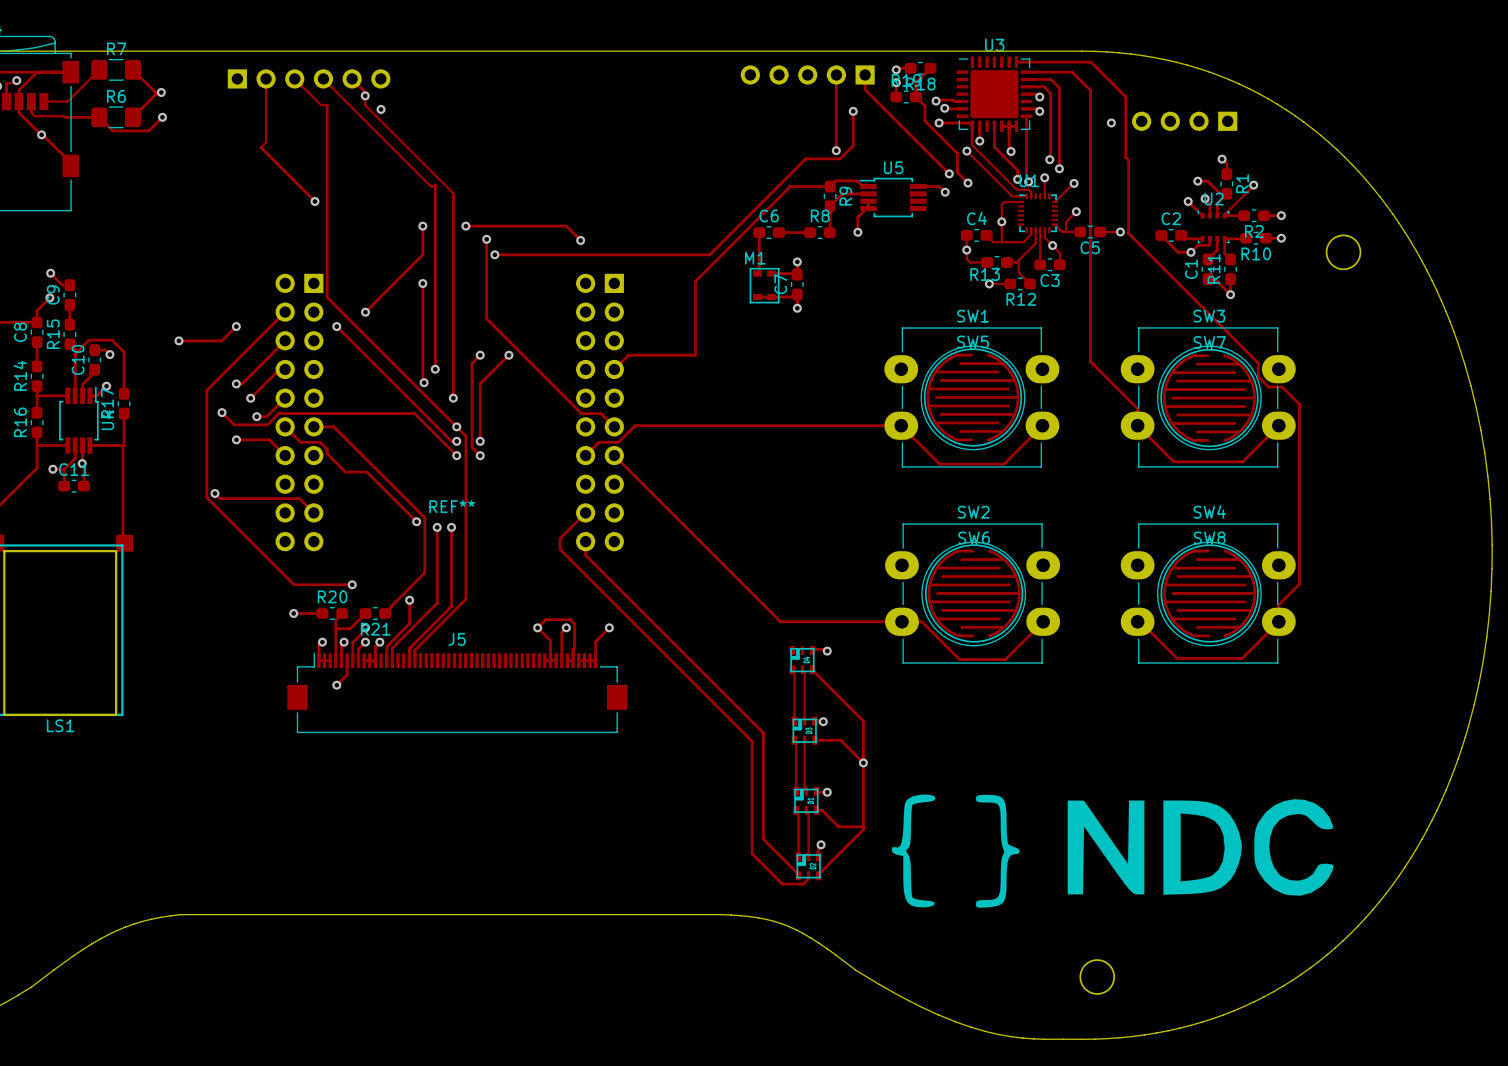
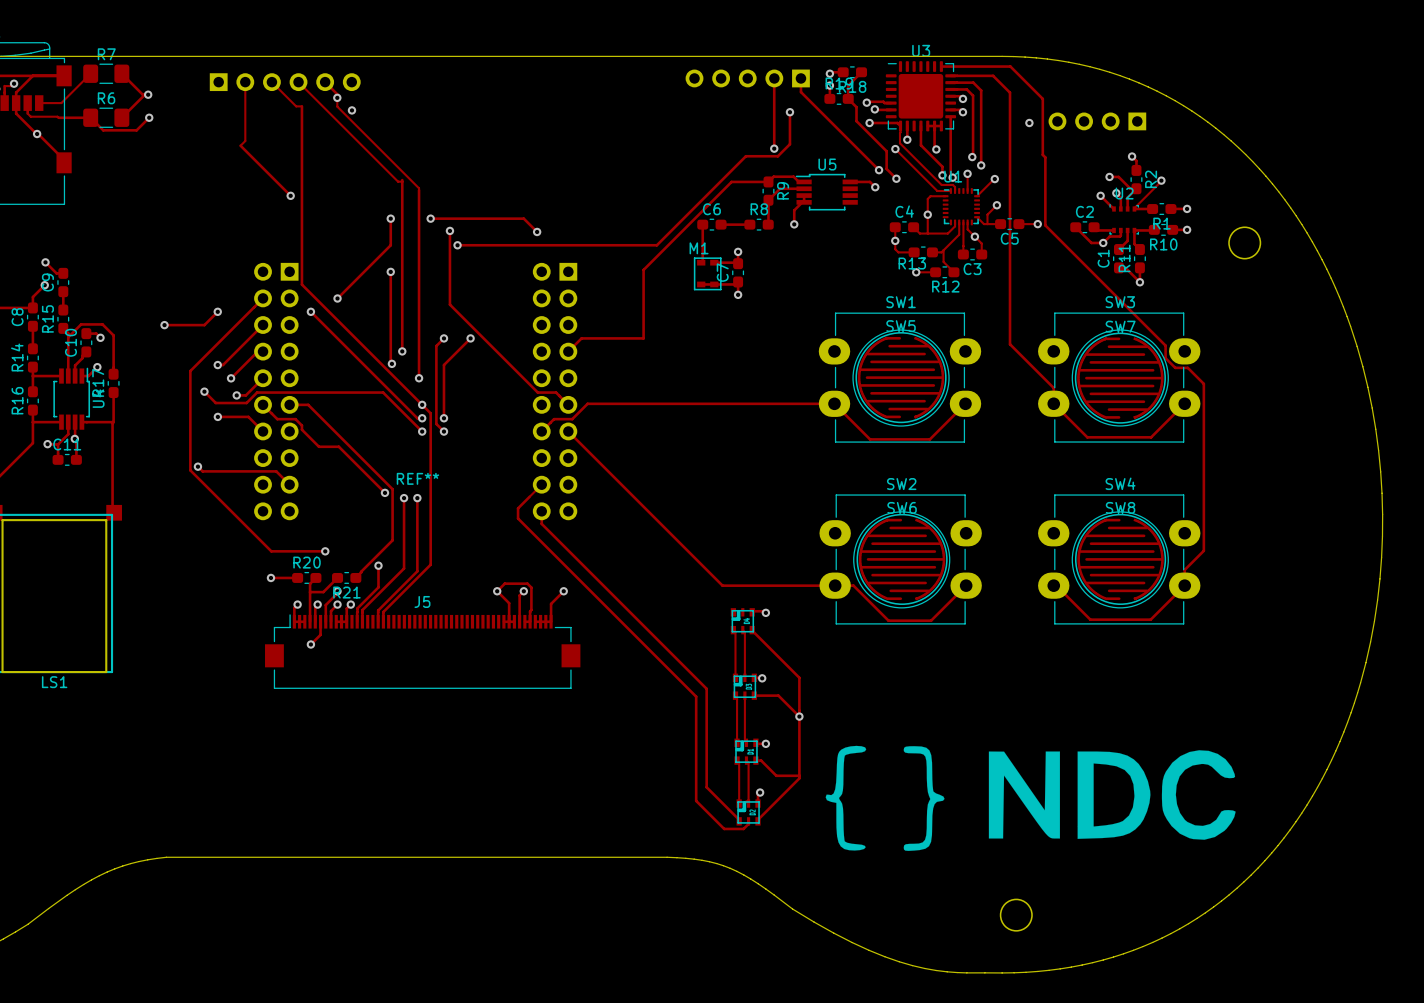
R1 name: R1 (1242, 183) -> R2 (1151, 179)
R2 name: R2 (1254, 231) -> R1 (1162, 223)

